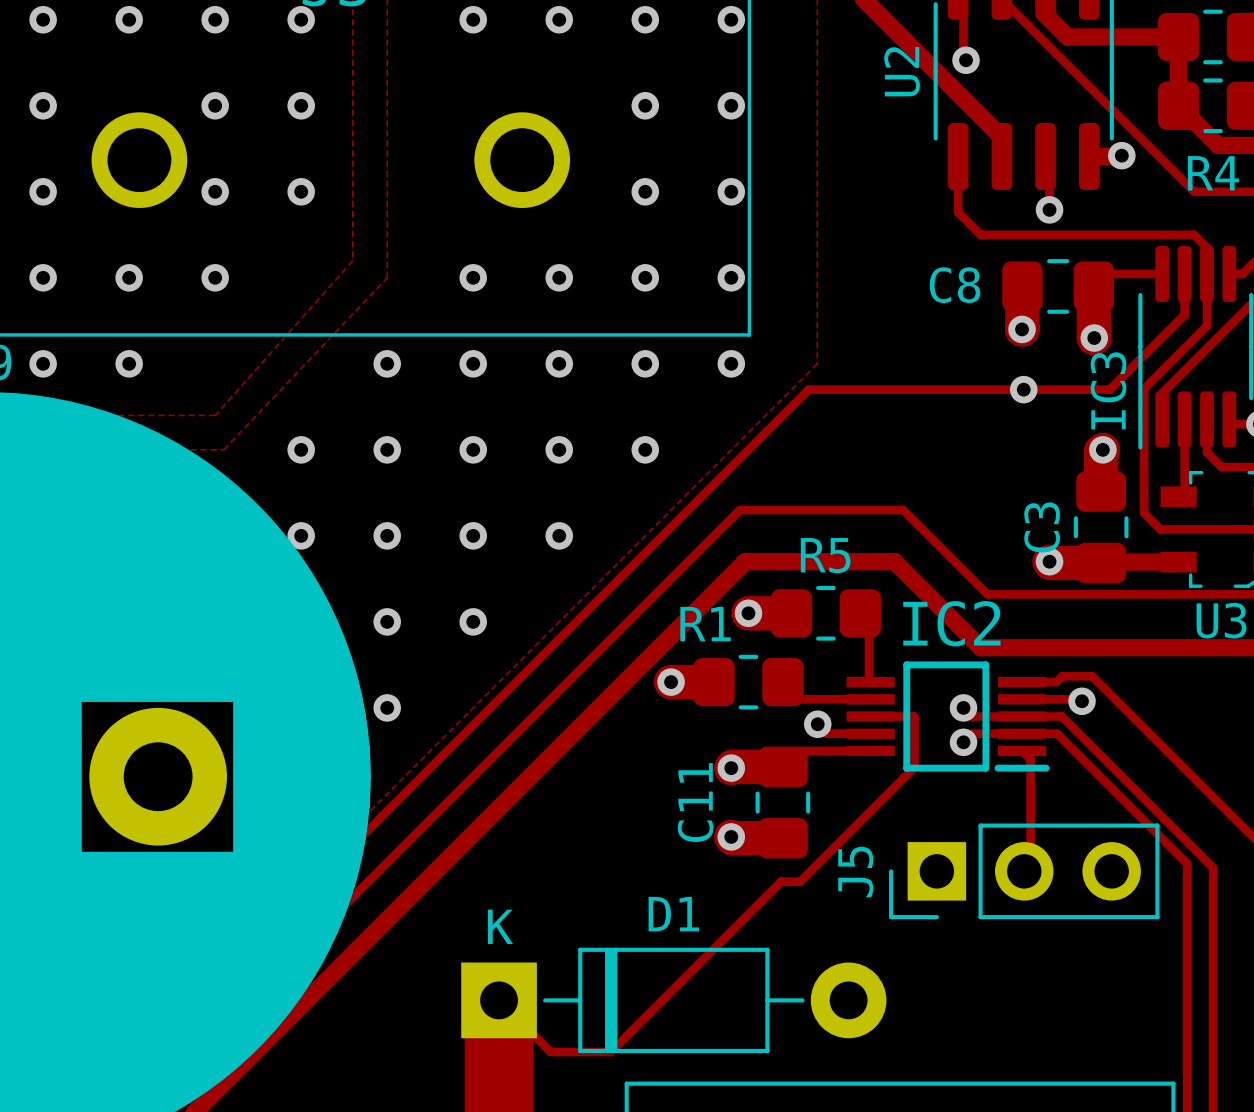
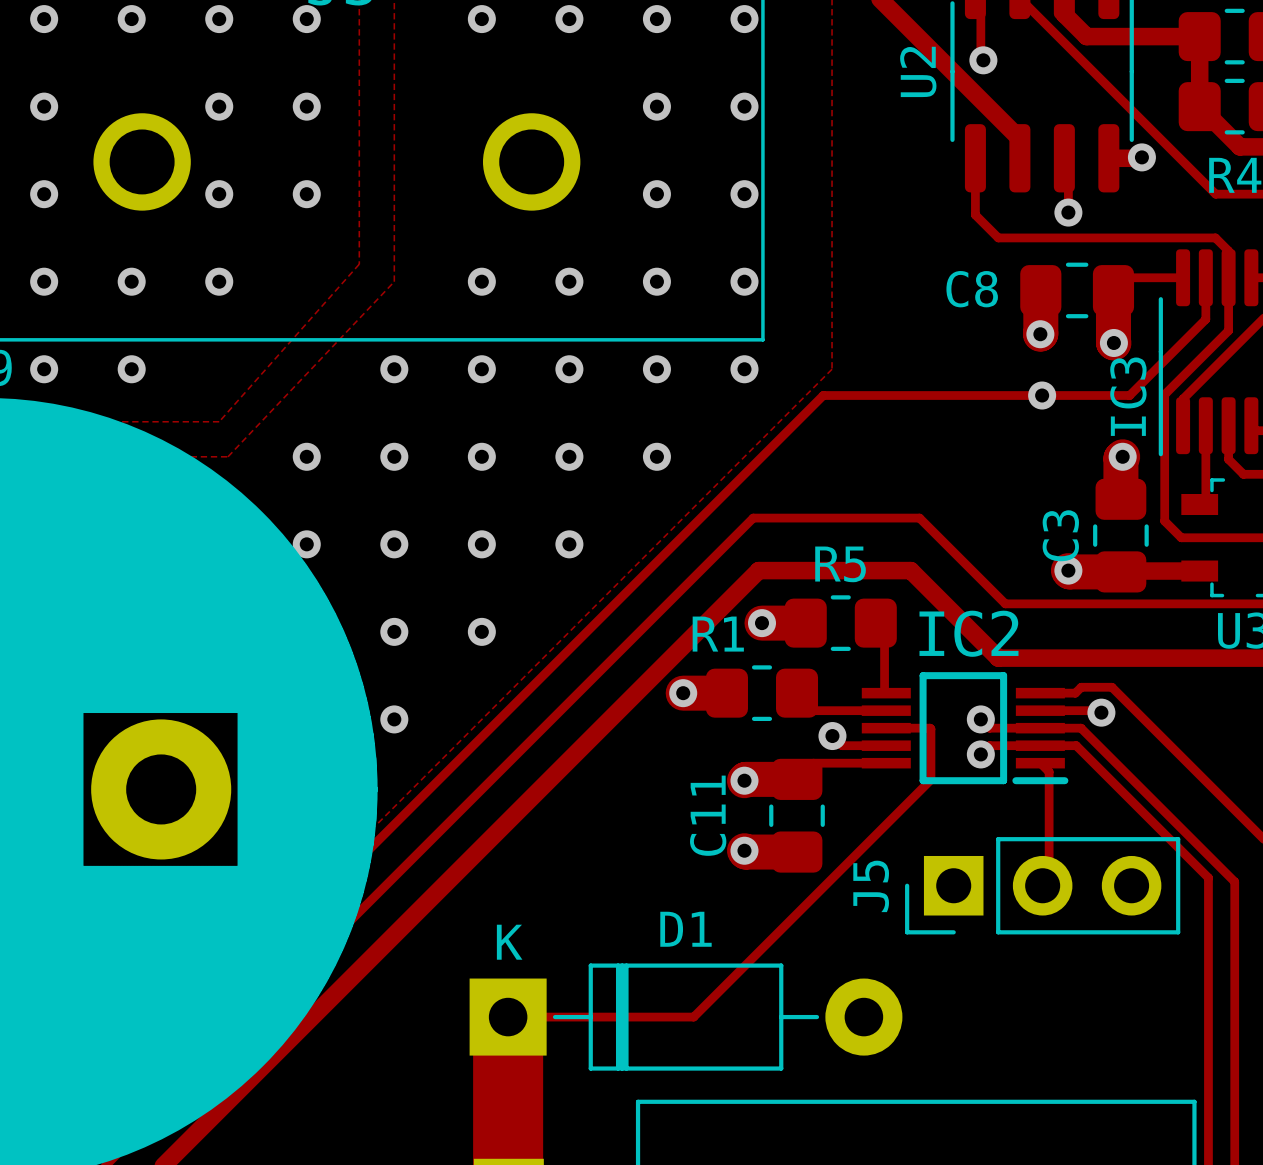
track: (800, 881) (781, 881) (610, 1051) (550, 1051) (499, 1000) -> (814, 896) (693, 1017) (508, 1017)

